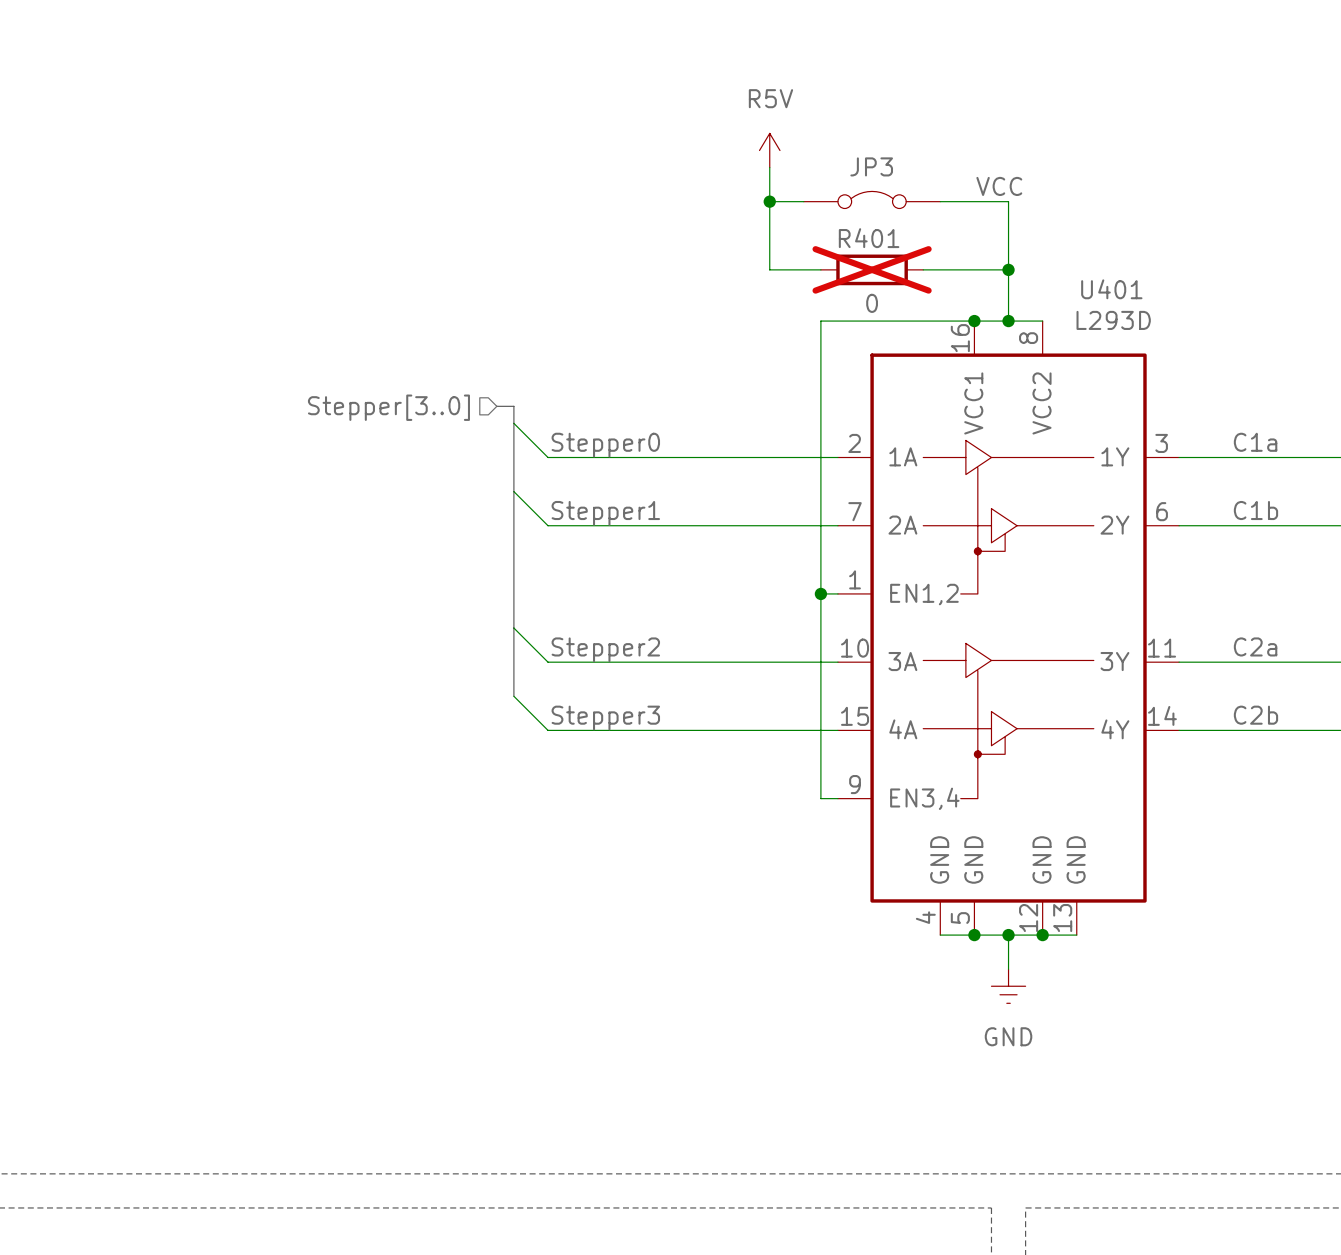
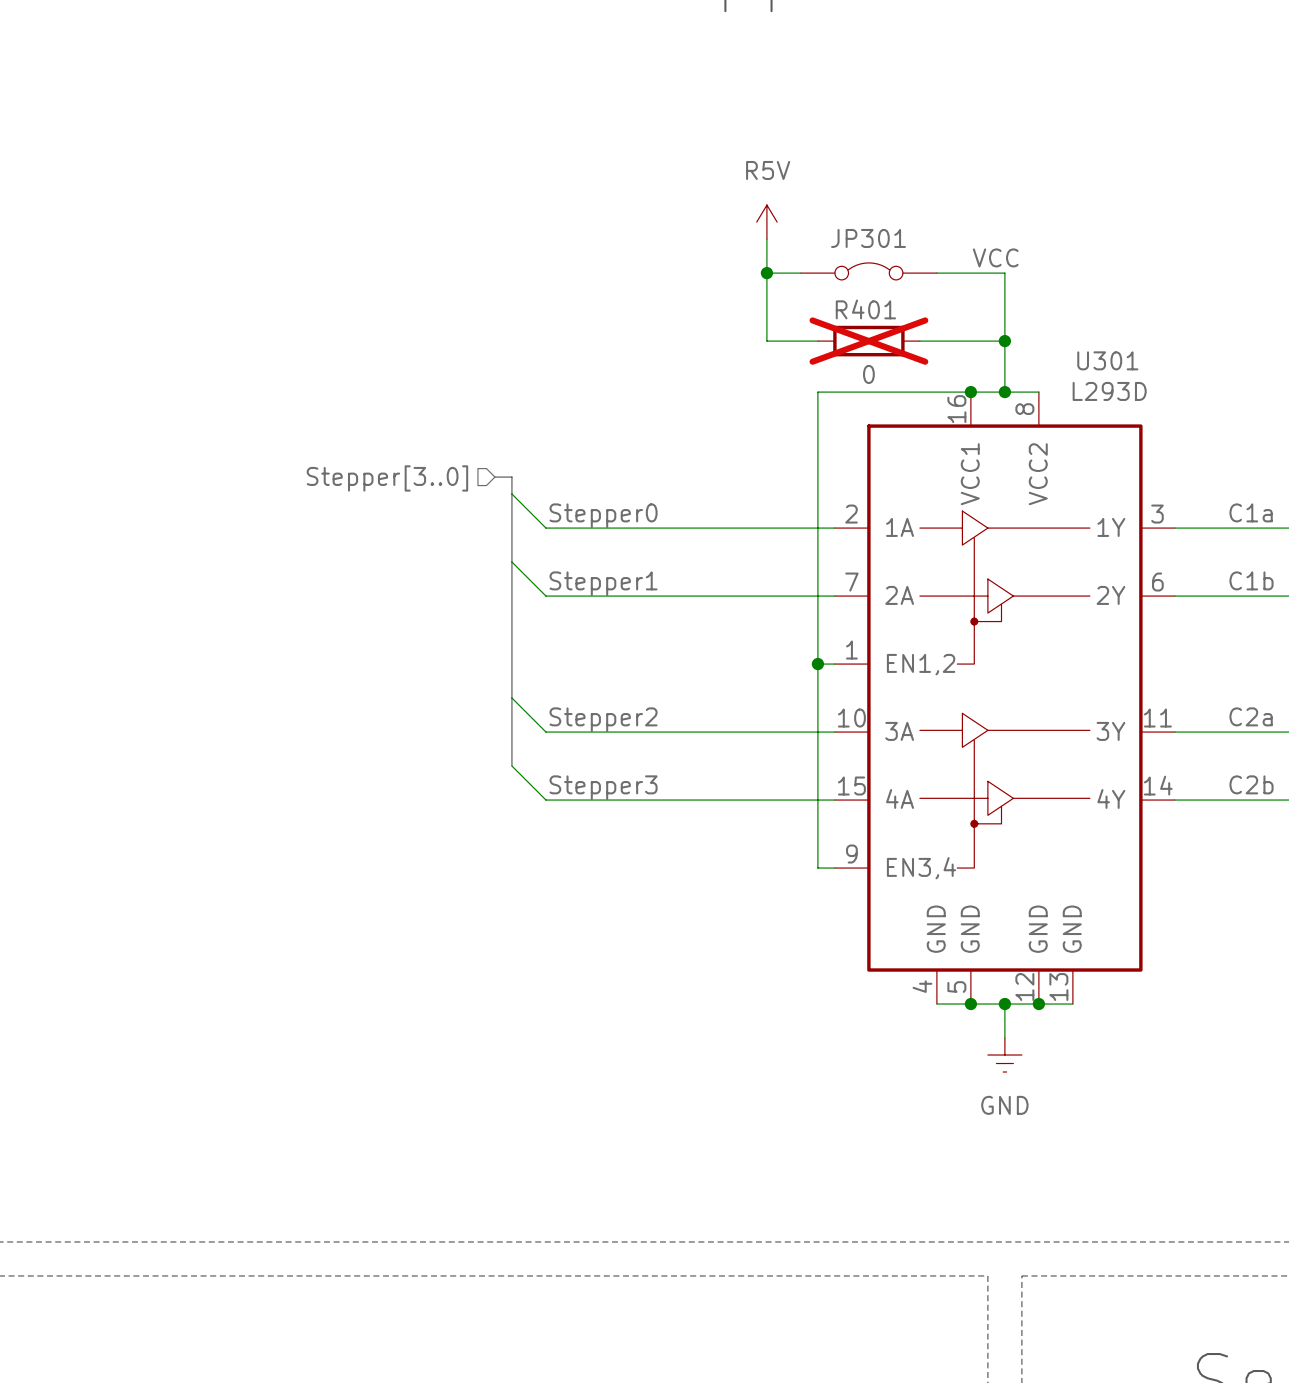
JP3 name: JP3 (871, 166) -> JP301 (868, 238)
U401 name: U401 (1111, 289) -> U301 (1107, 360)

